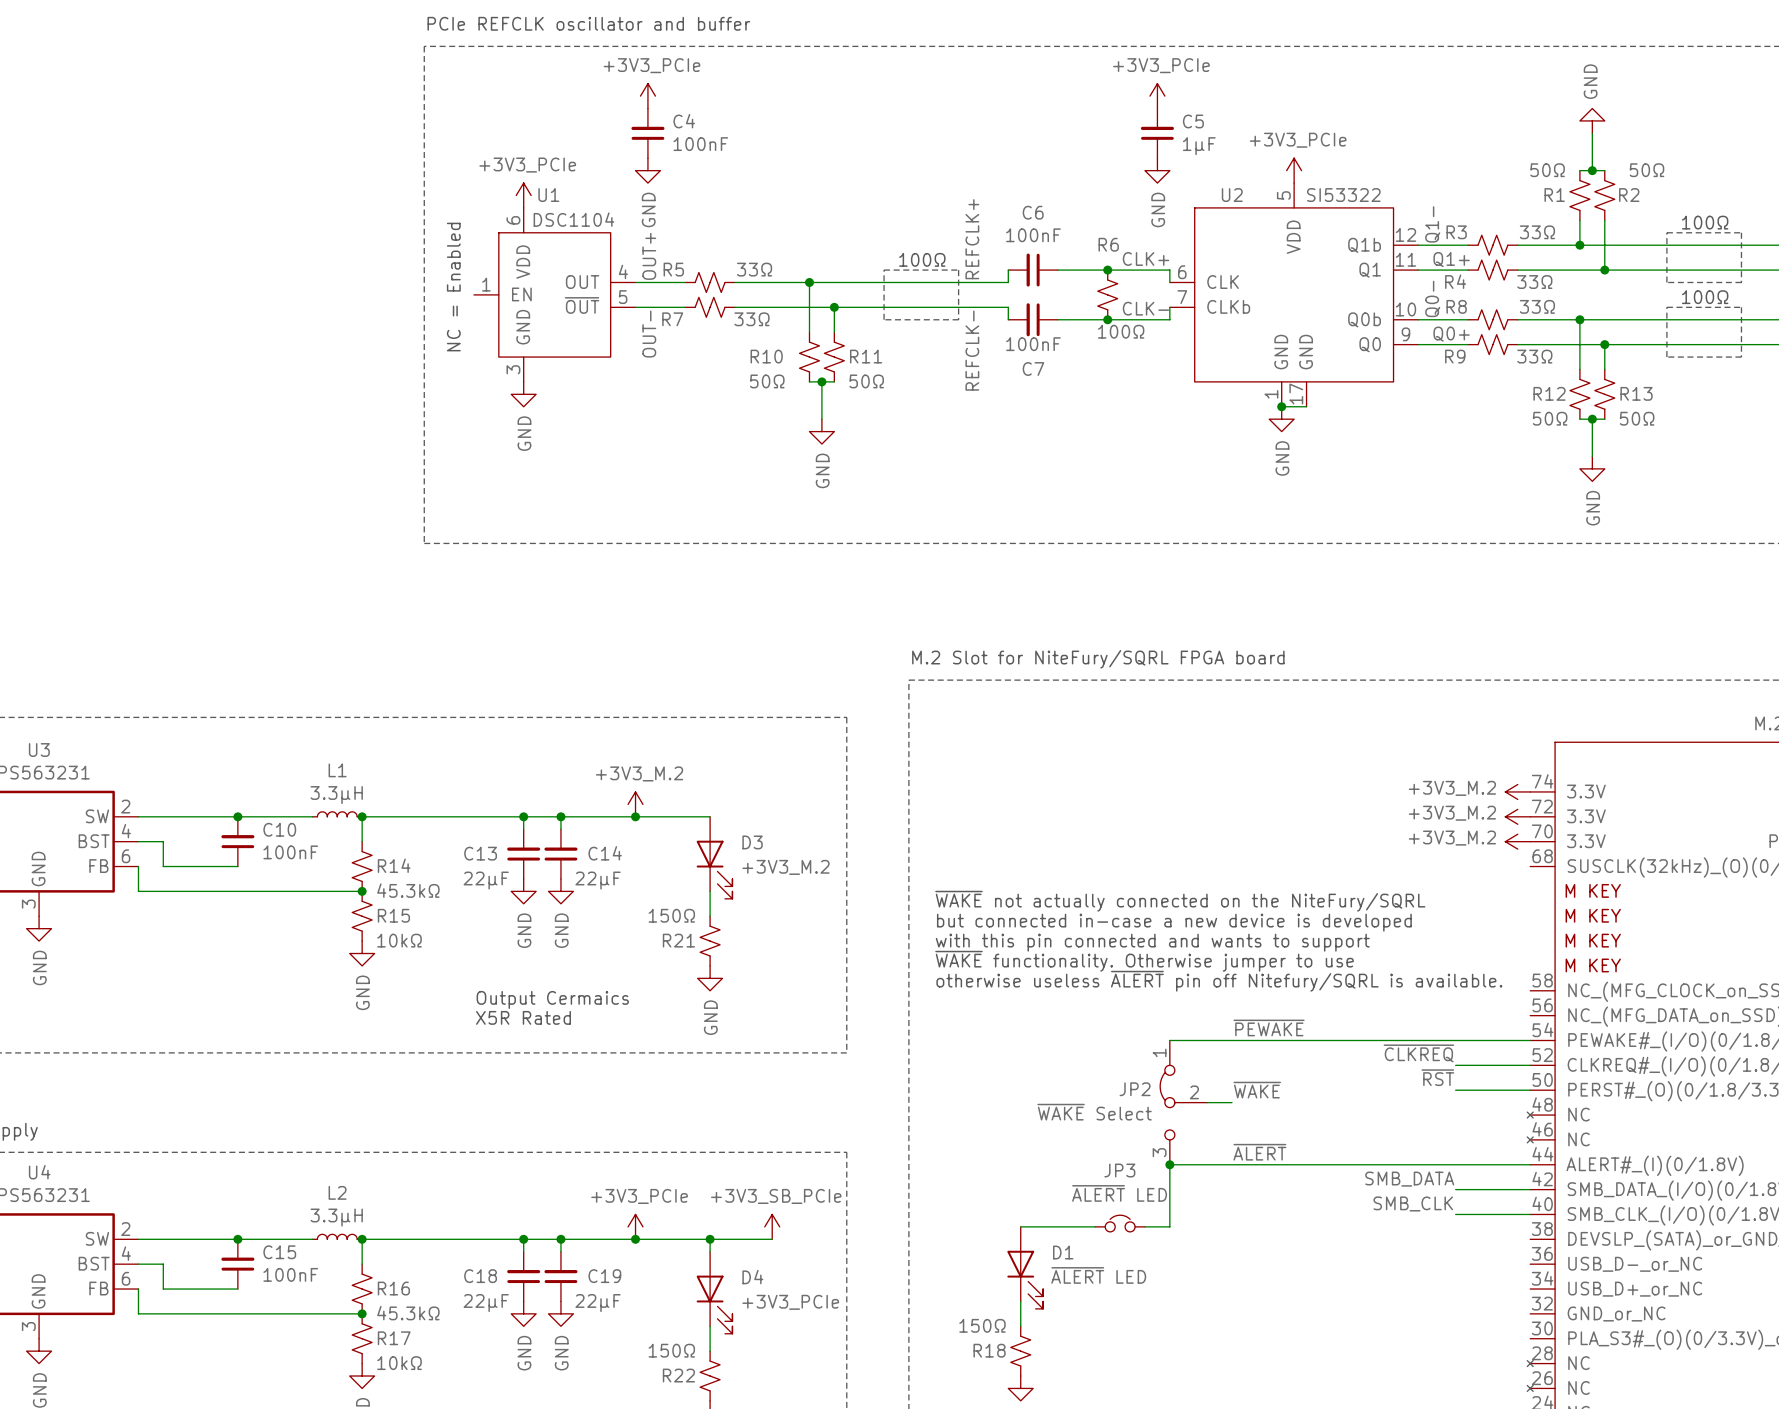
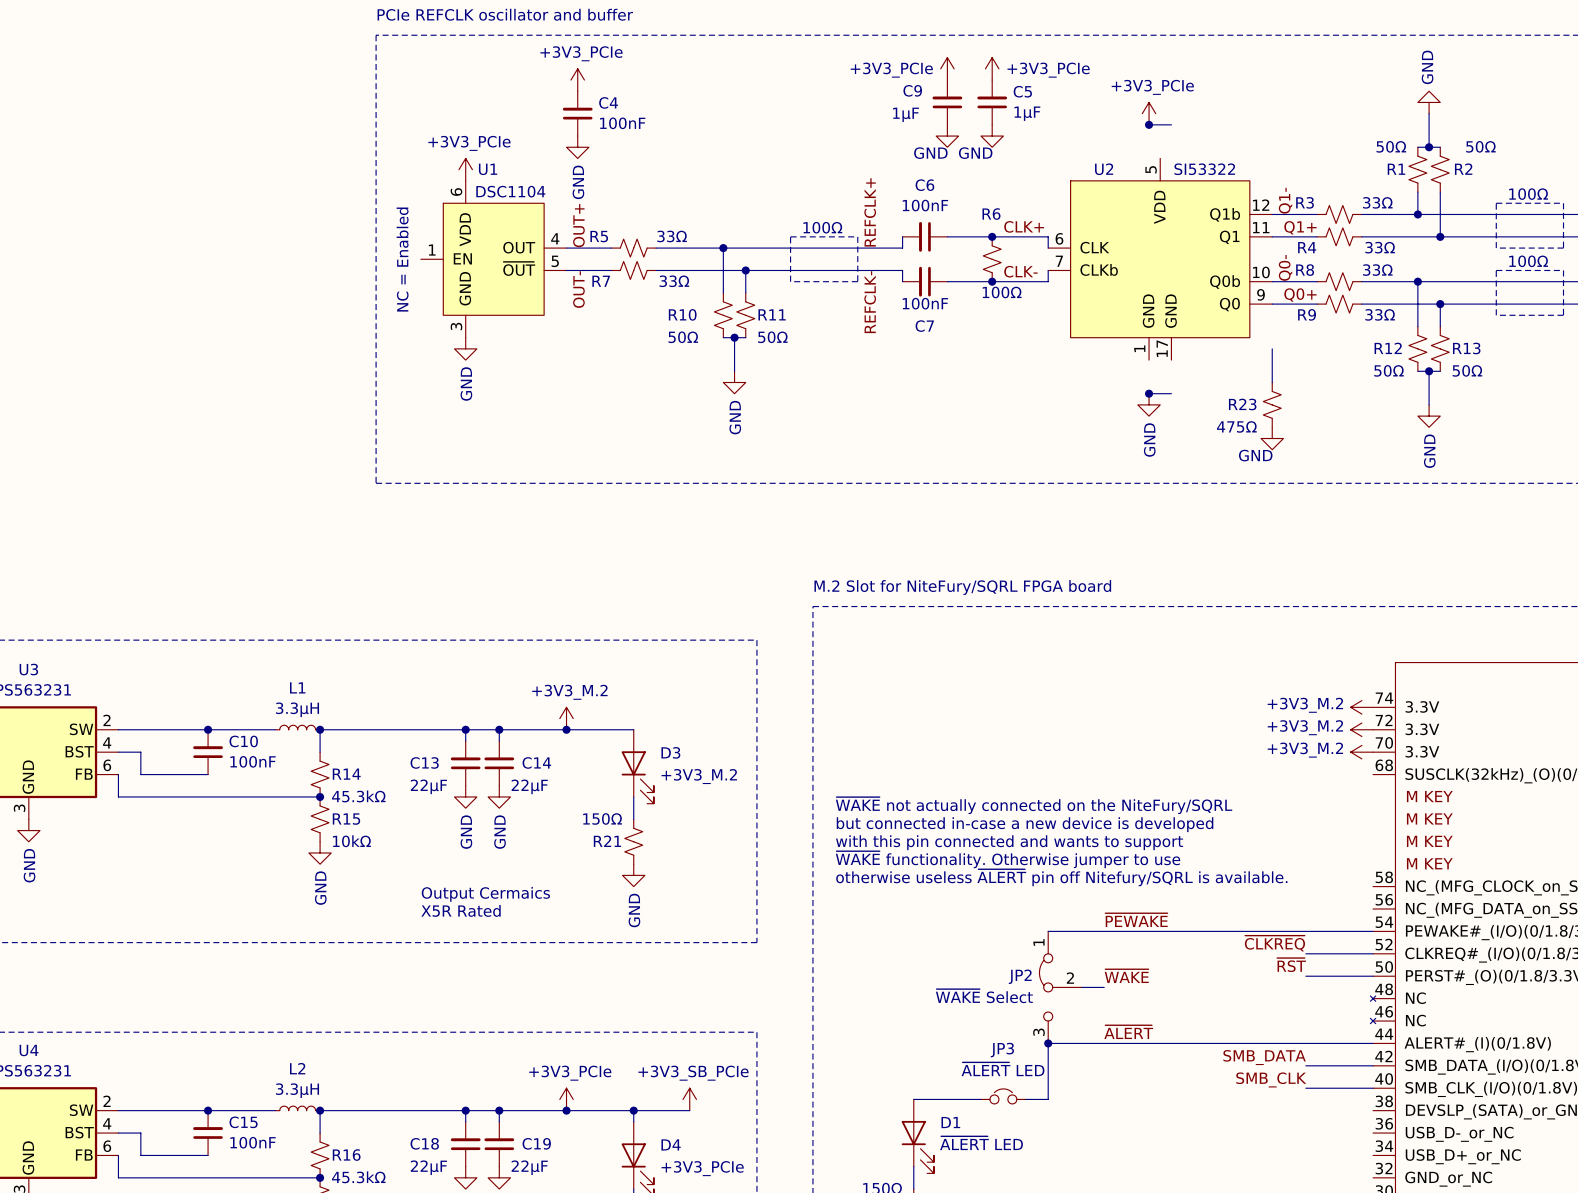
power symbol: none -> +3V3_PCIe (947, 68)
power symbol: none -> +3V3_PCIe (992, 68)
power symbol: +3V3_PCIe (1157, 96) -> none
C9: none -> 1μF (947, 102)
C5 position: (1157, 133) -> (992, 102)
wire: none -> (1149, 124) (1171, 124)
junction: none -> (1149, 124)
power symbol: none -> GND (947, 136)
power symbol: none -> GND (992, 136)
power symbol: GND (1157, 170) -> none
power symbol position: +3V3_PCIe (1294, 170) -> +3V3_PCIe (1149, 113)
wire: none -> (1272, 348) (1272, 382)
wire: (1281, 406) (1306, 406) -> (1149, 393) (1171, 393)
junction position: (1281, 406) -> (1149, 393)
power symbol position: GND (1281, 419) -> GND (1149, 404)
R23: none -> 475Ω (1272, 404)
power symbol: none -> GND (1272, 438)

